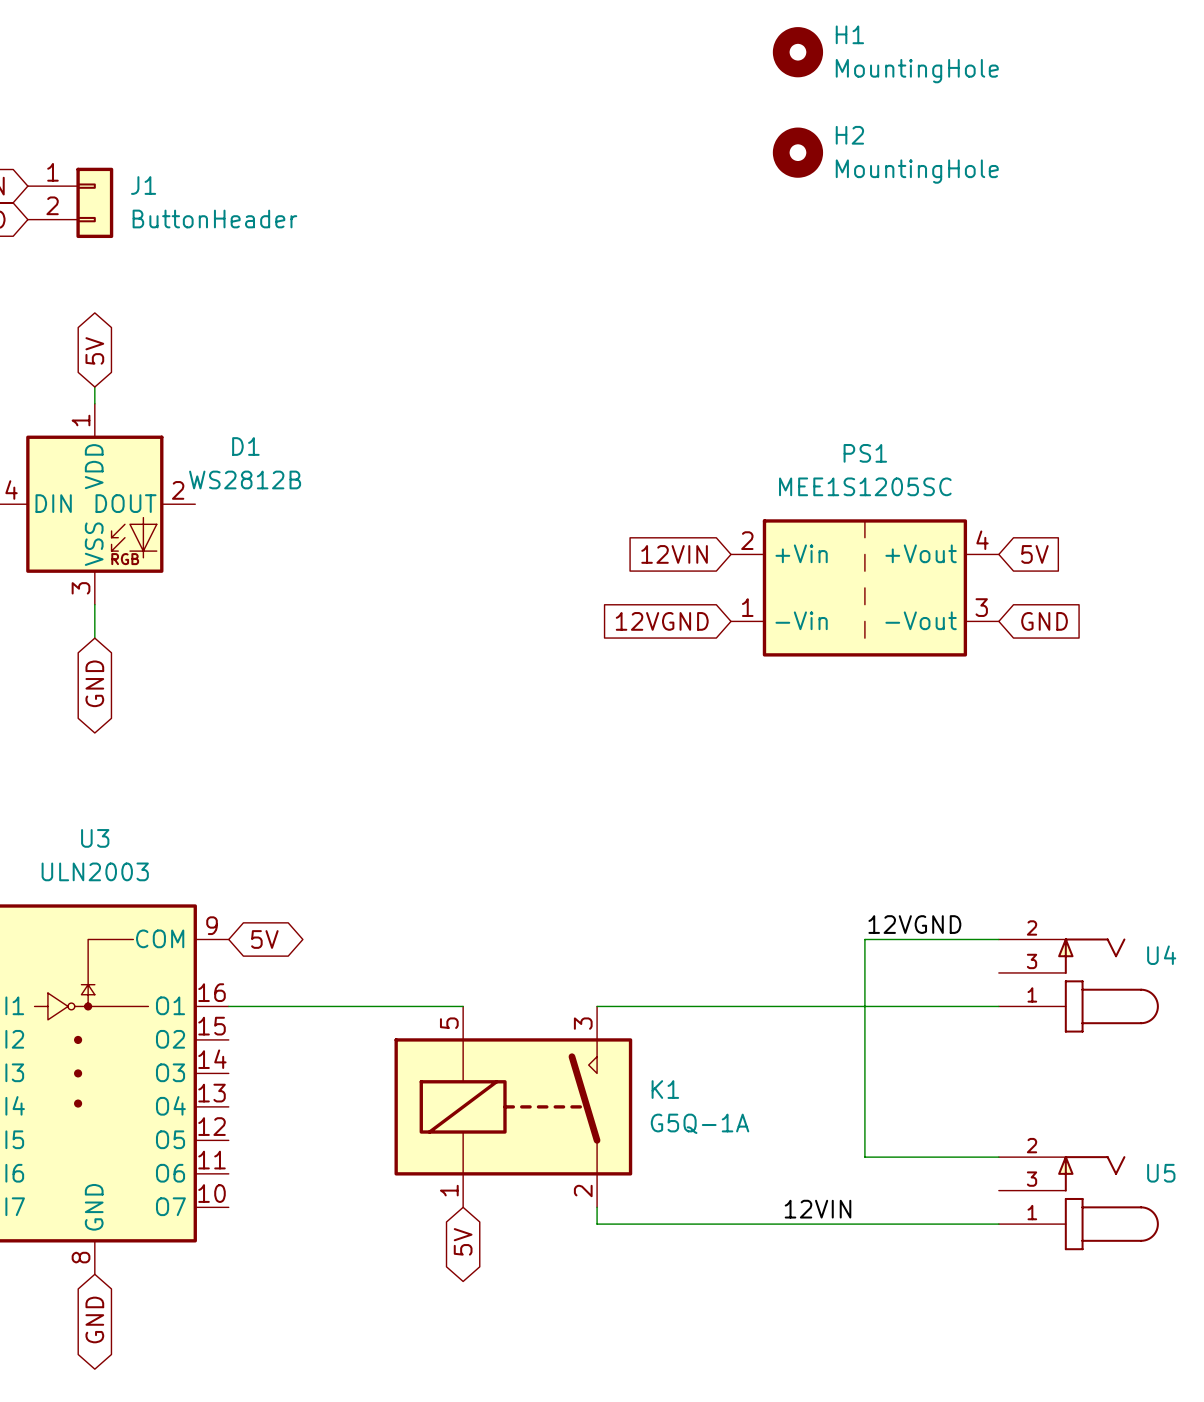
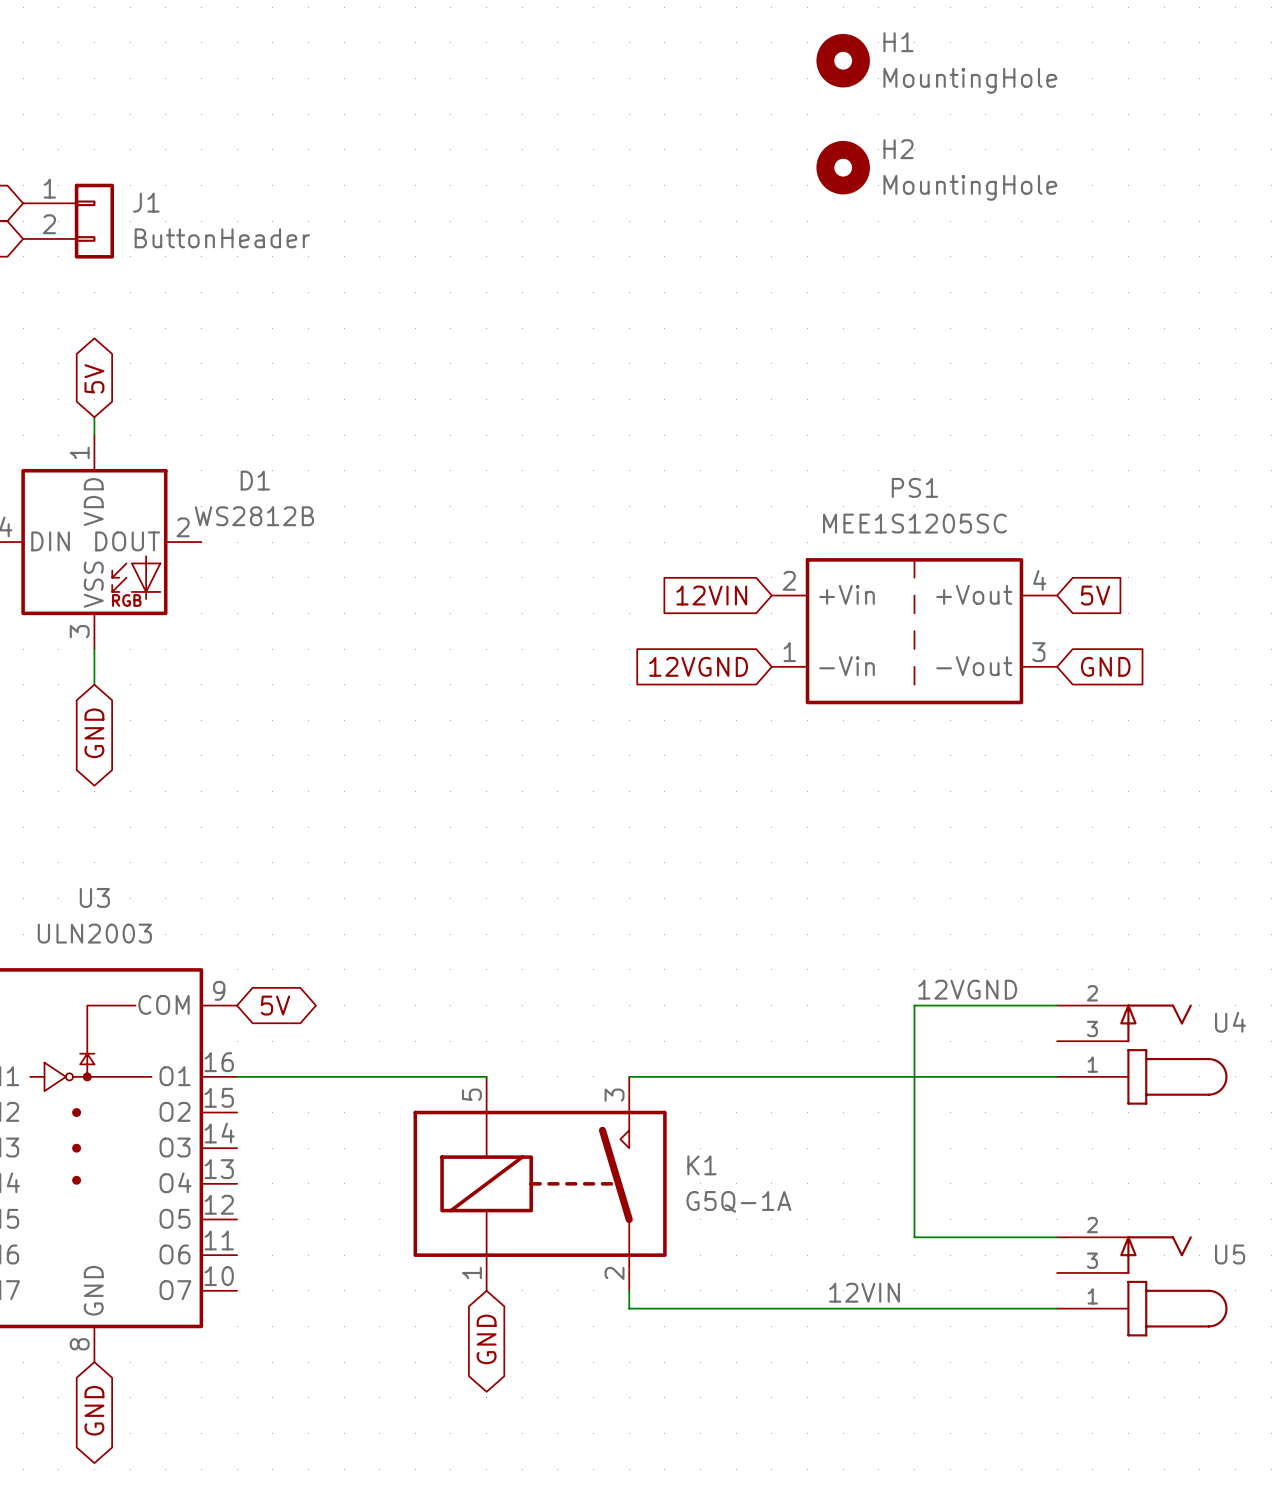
global label: 5V (463, 1241) -> GND (486, 1339)

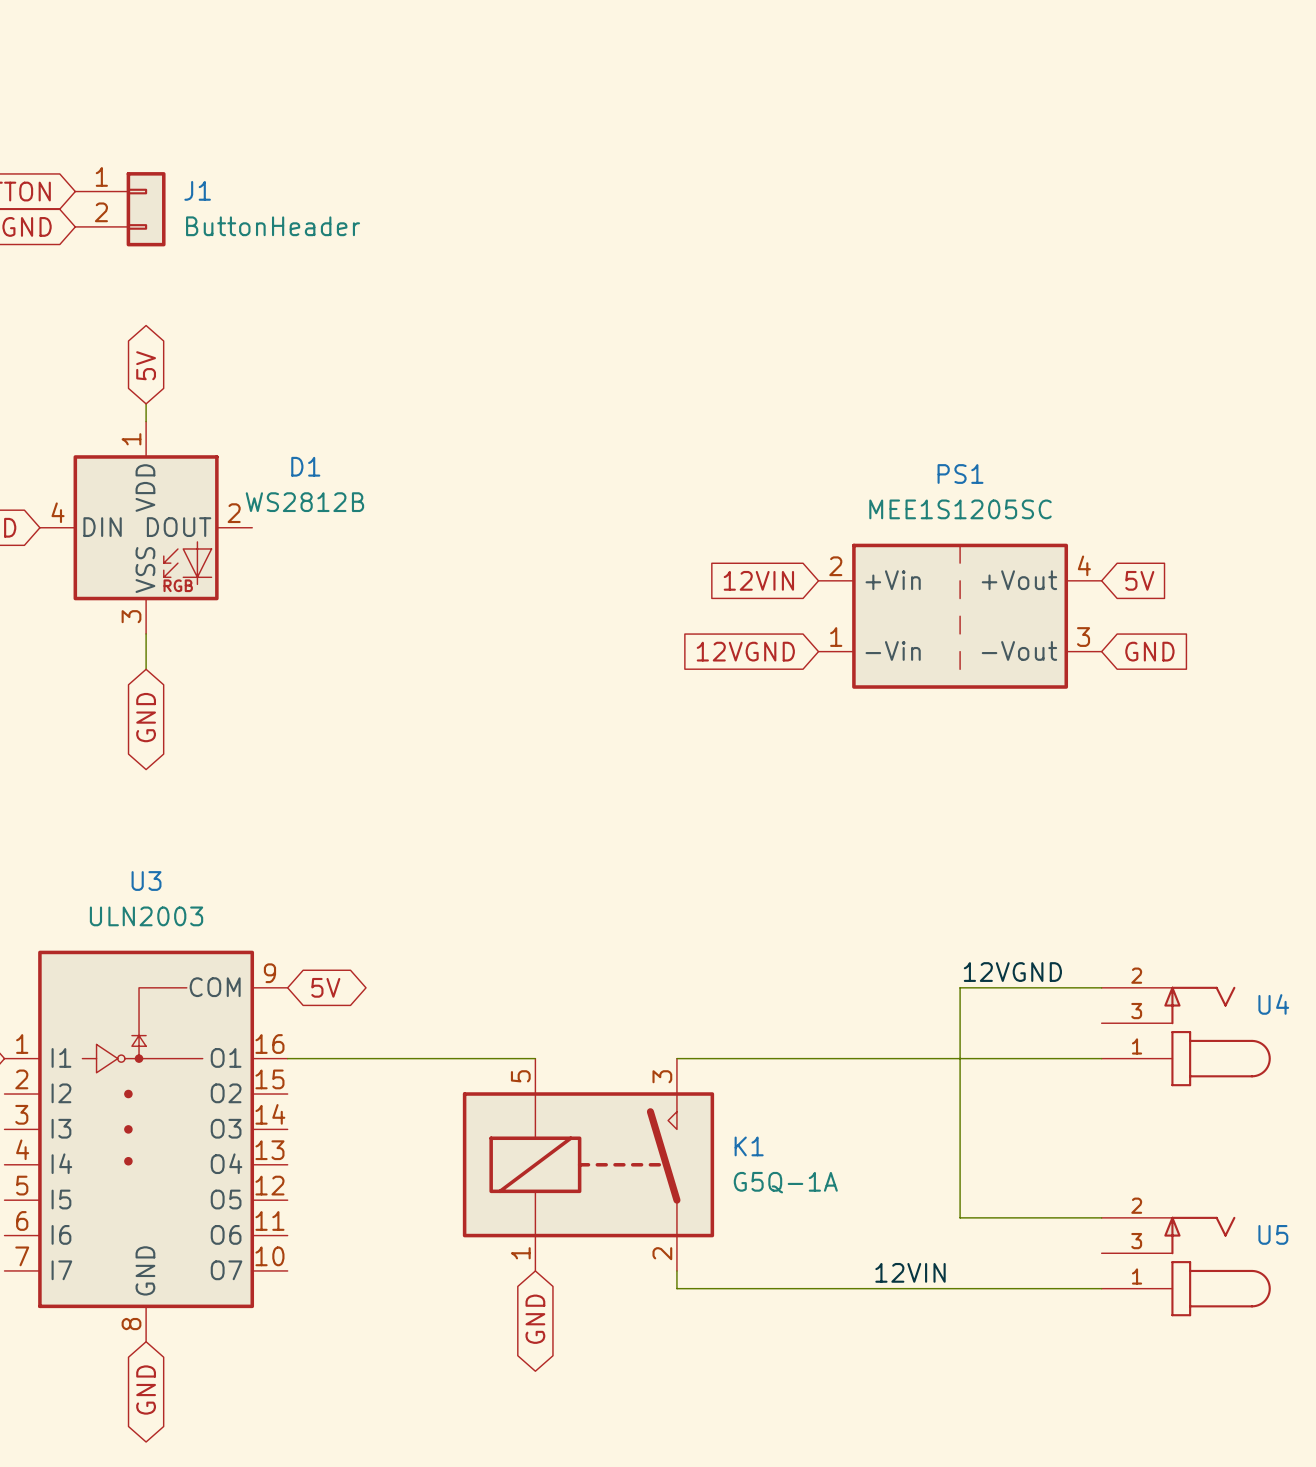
H1: MountingHole (843, 60) -> none
H2: MountingHole (843, 167) -> none

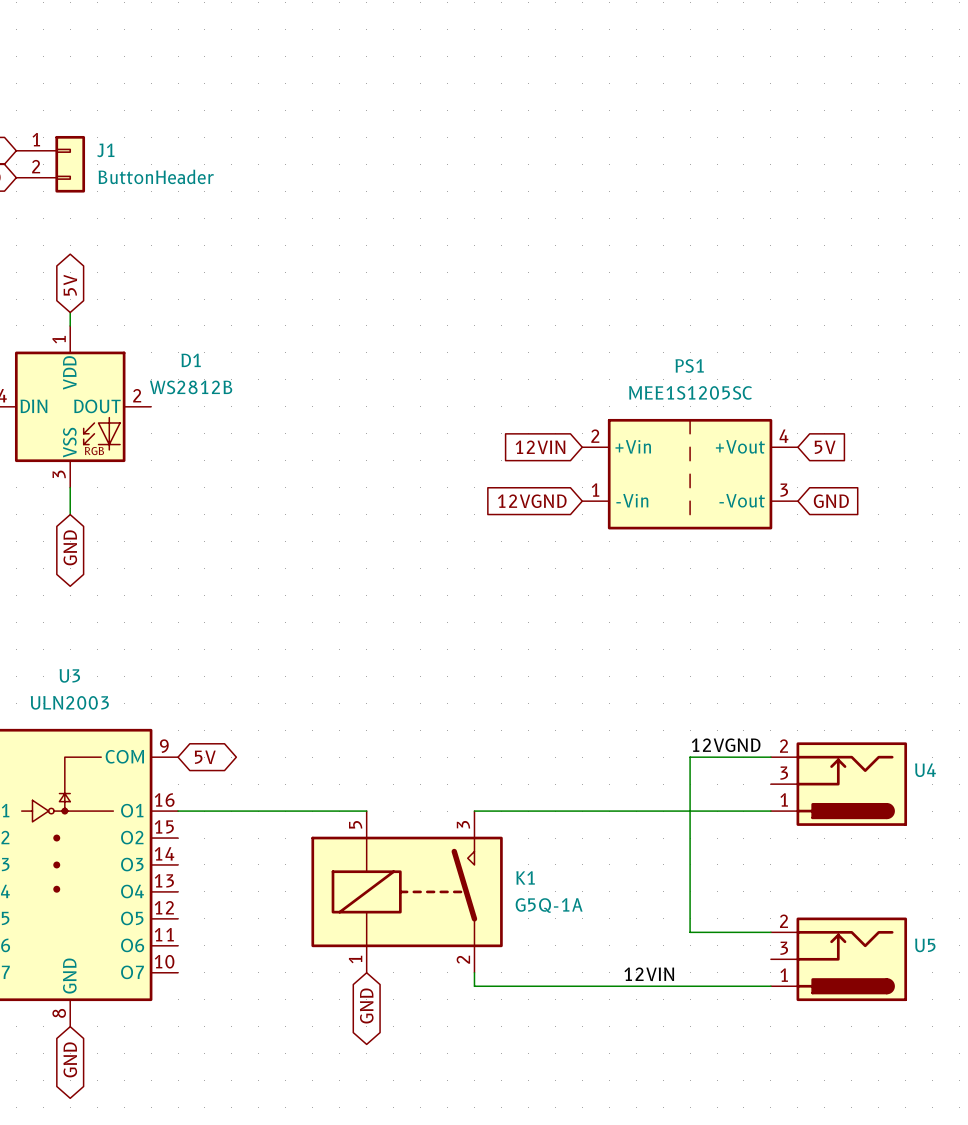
U4 symbol: [1101, 986, 1271, 1087] -> [770, 742, 908, 826]
U5 symbol: [1101, 1216, 1271, 1317] -> [770, 917, 908, 1002]

